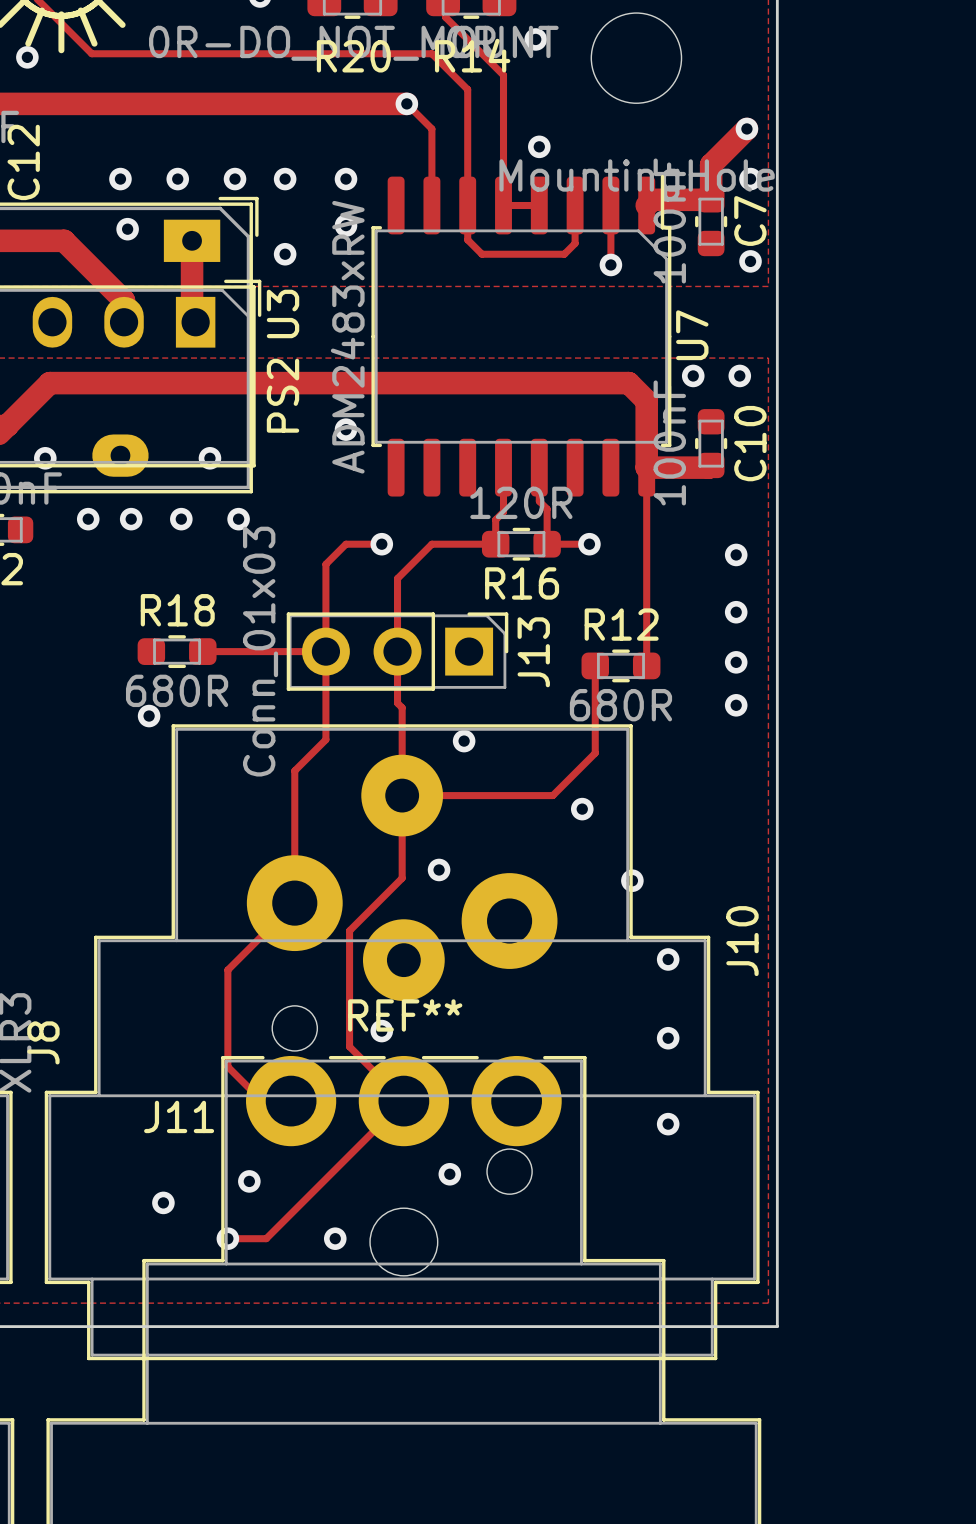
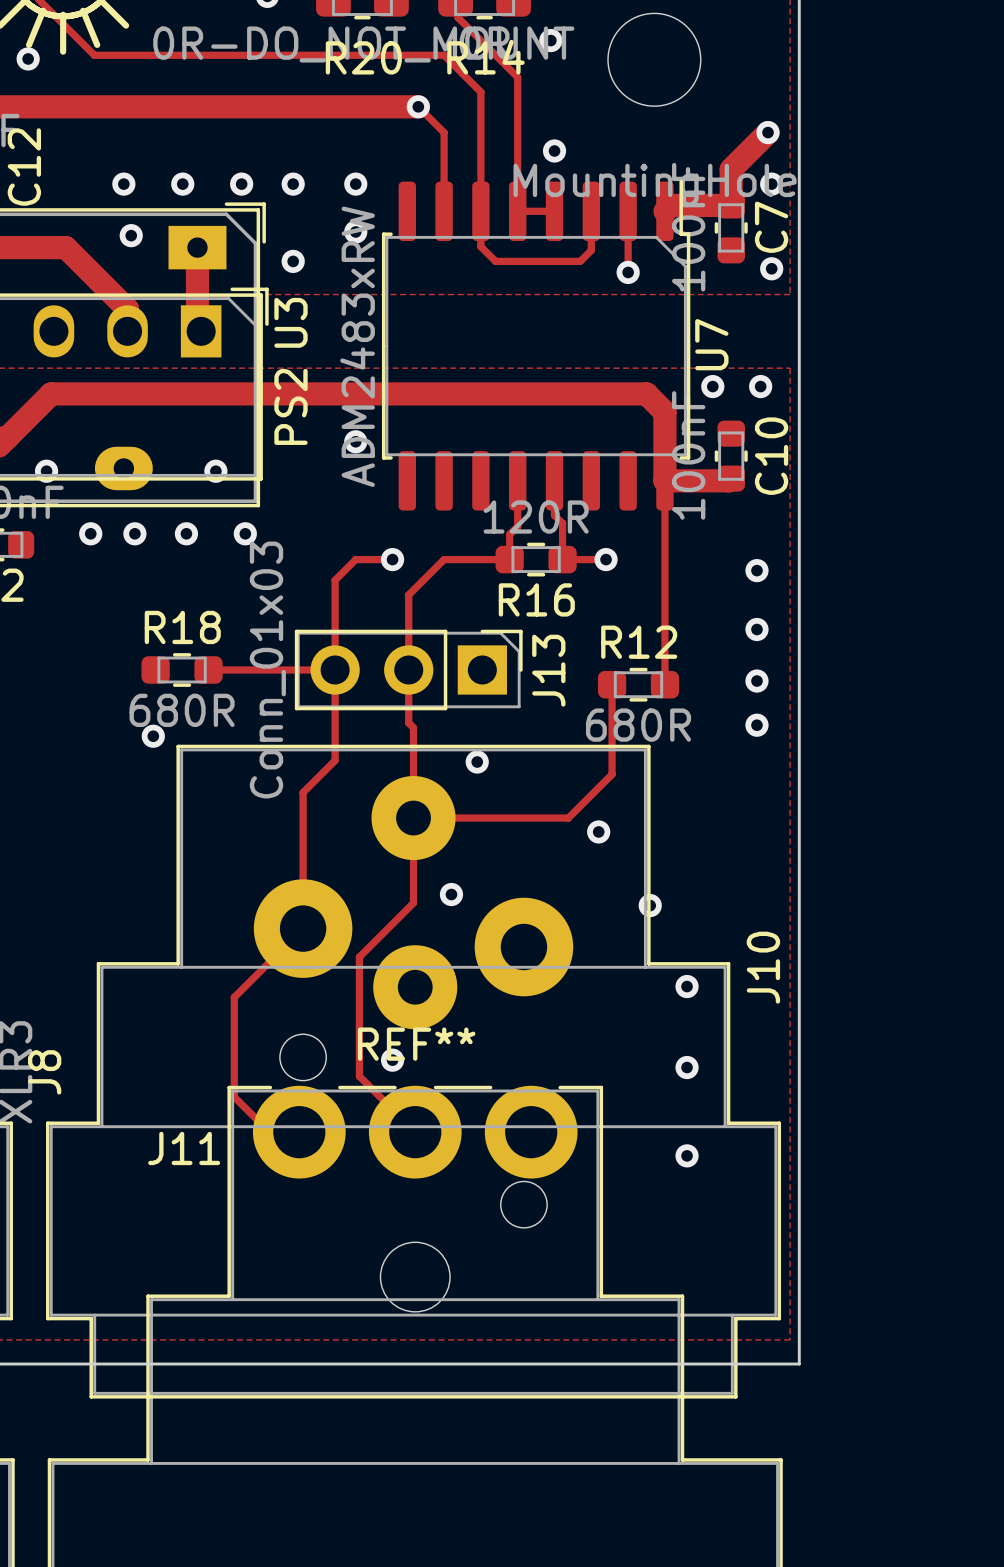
track: (403, 1101) (266, 1238) (227, 1238) -> none
via: (449, 1174) -> none
via: (249, 1181) -> none
via: (163, 1202) -> none
via: (227, 1238) -> none
via: (335, 1238) -> none

